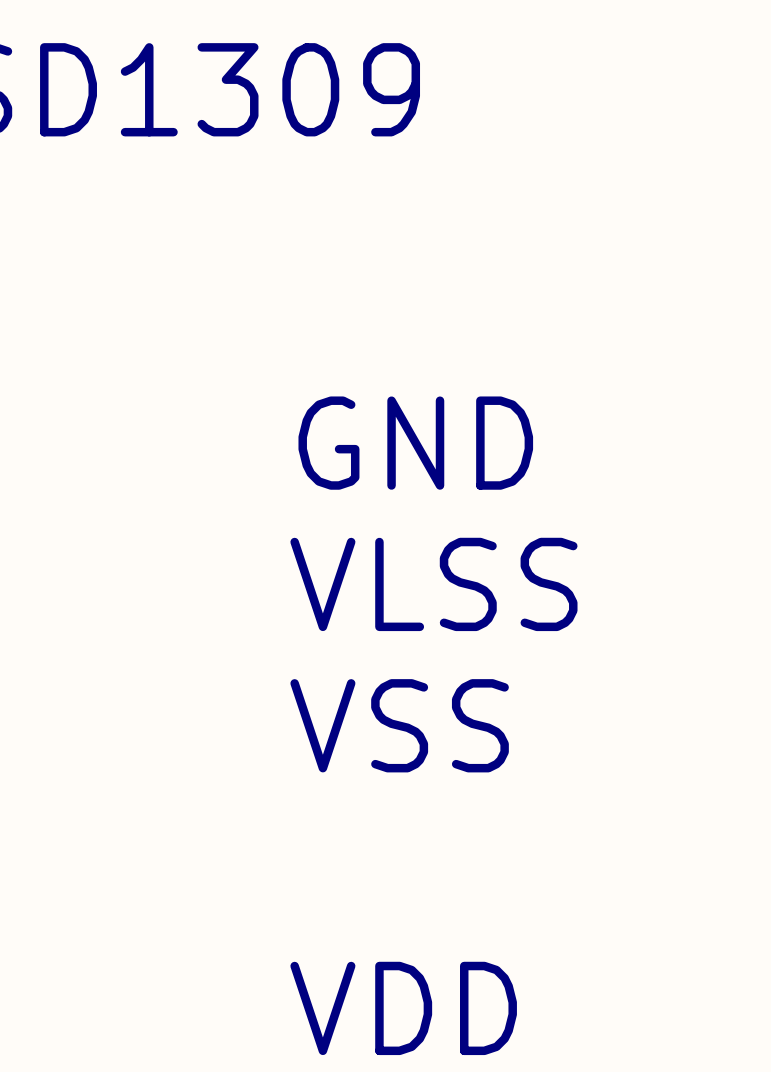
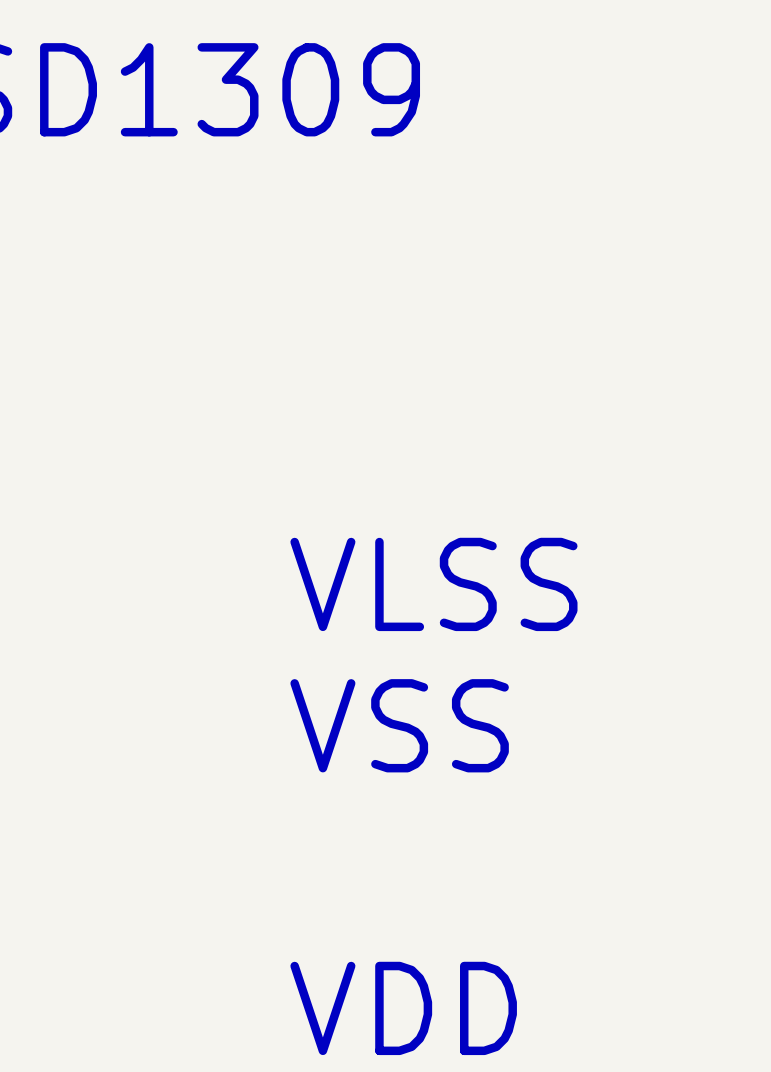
text: GND (415, 443) -> none

